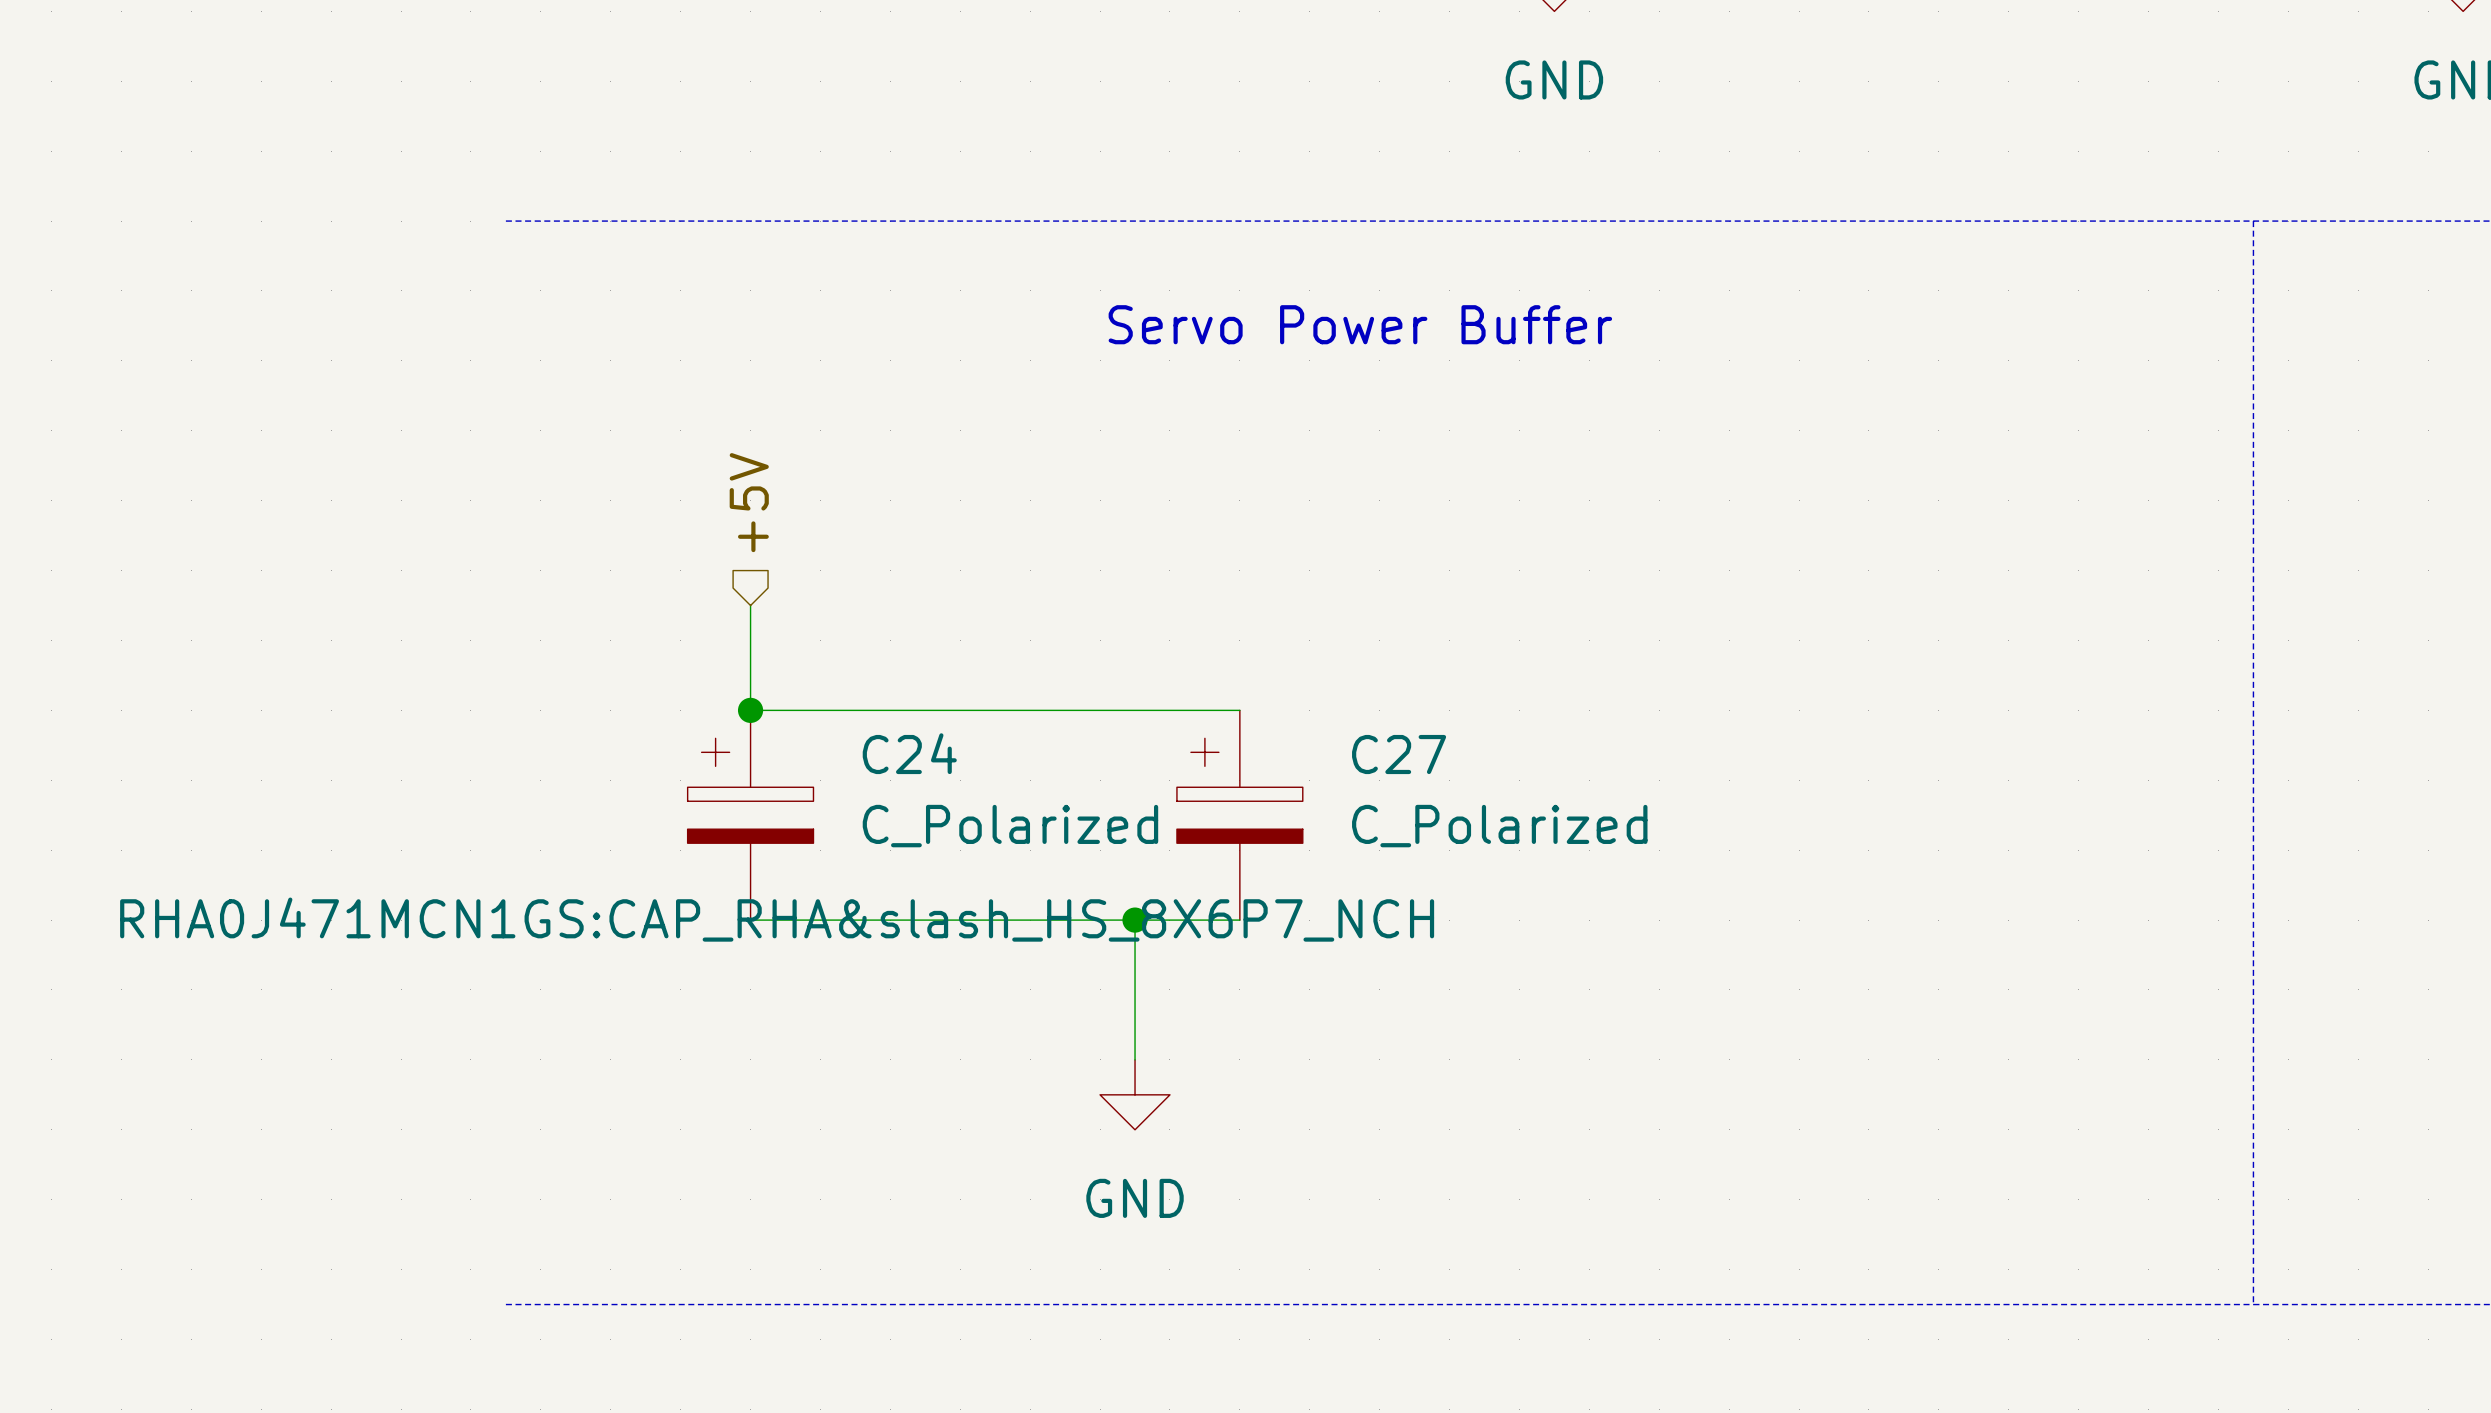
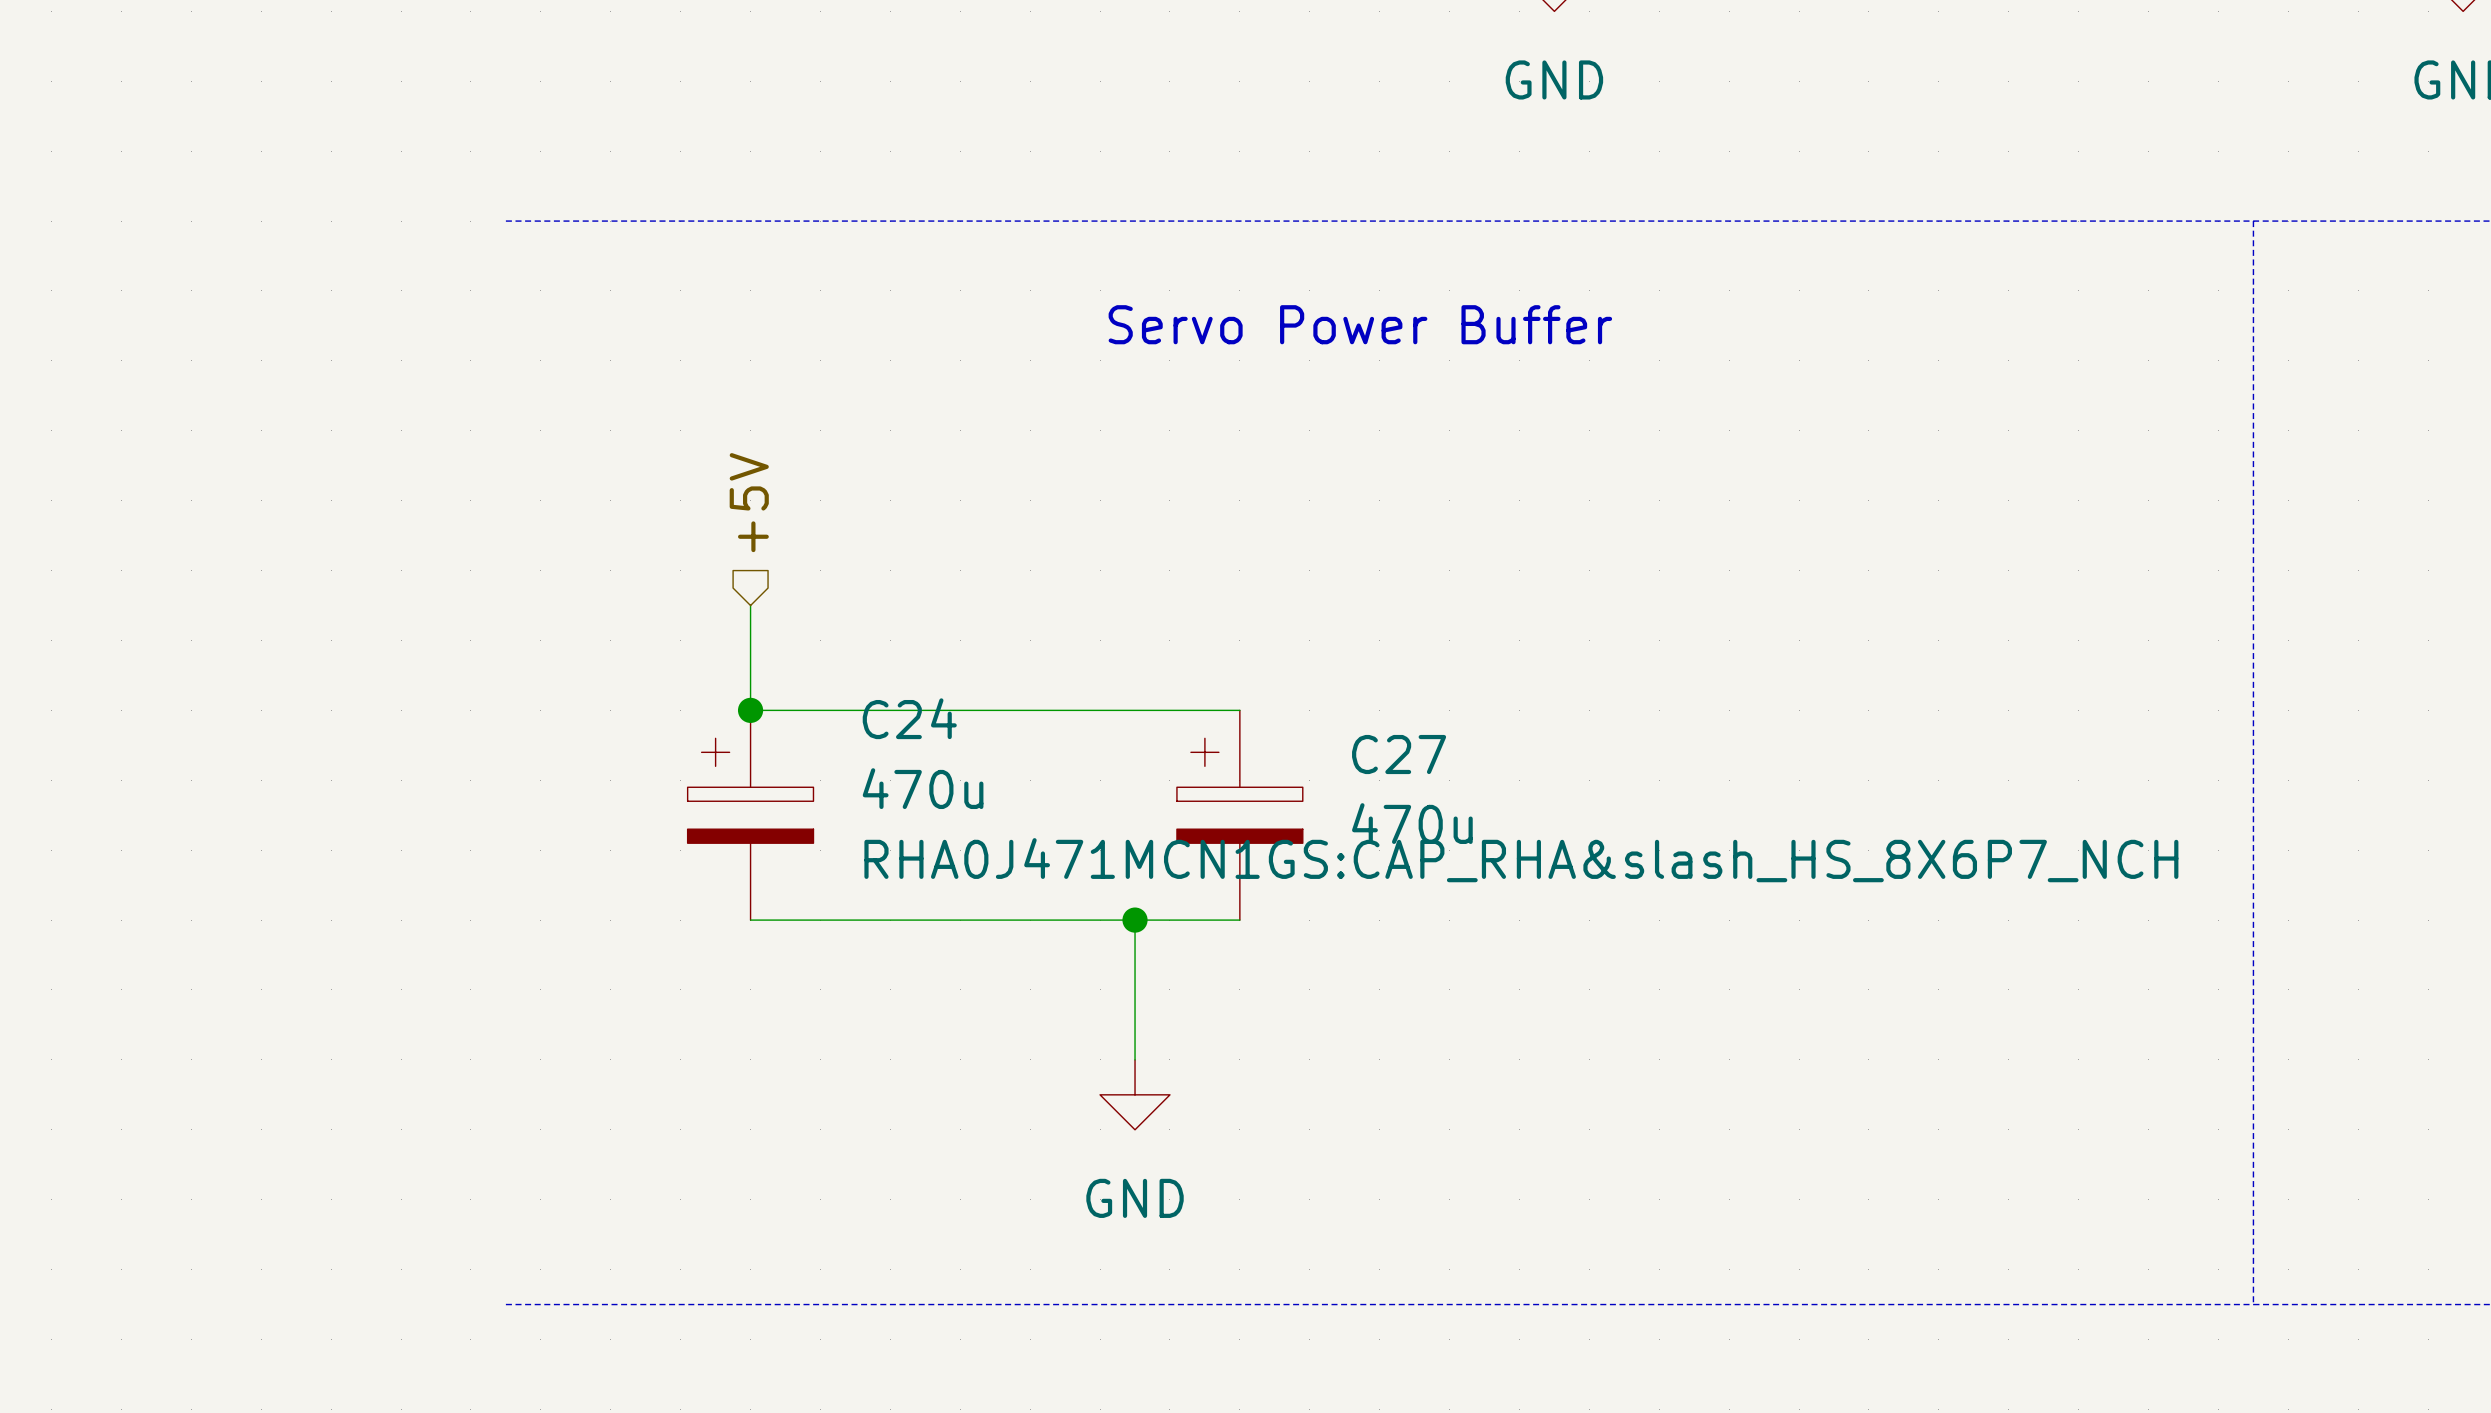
C24 name position: C24 (909, 753) -> C24 (909, 718)
C24 value: C_Polarized (1010, 826) -> 470u (923, 788)
C27 value: C_Polarized (1499, 826) -> 470u (1412, 823)
C24 text position: RHA0J471MCN1GS:CAP_RHA&slash_HS_8X6P7_NCH (777, 919) -> RHA0J471MCN1GS:CAP_RHA&slash_HS_8X6P7_NCH (1521, 860)

